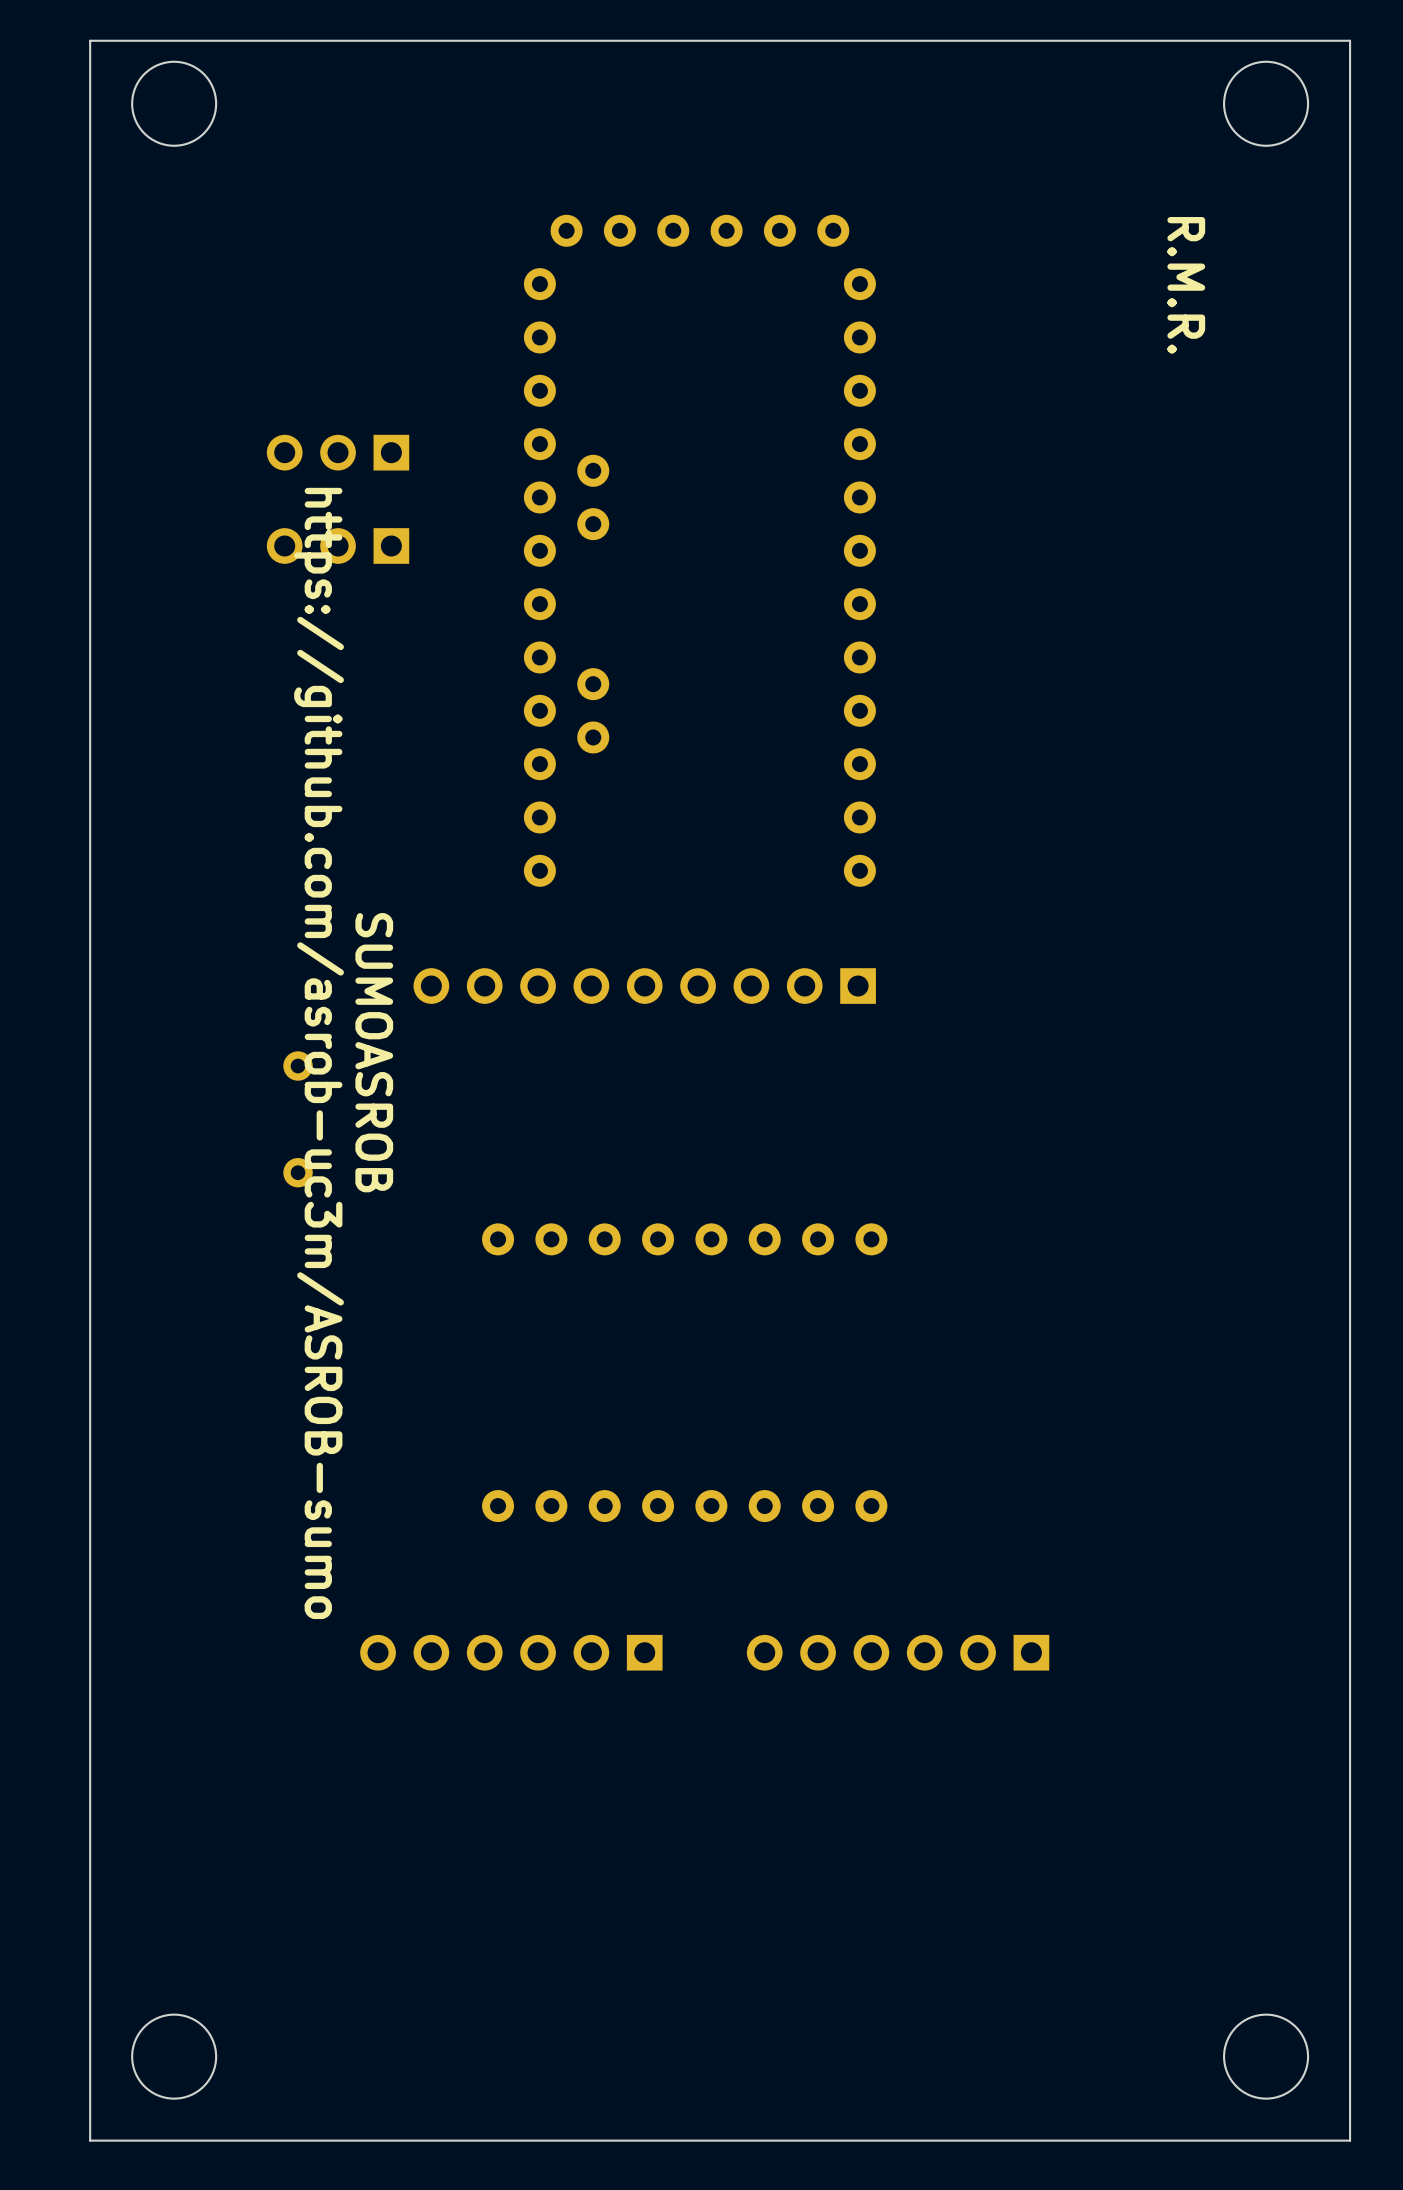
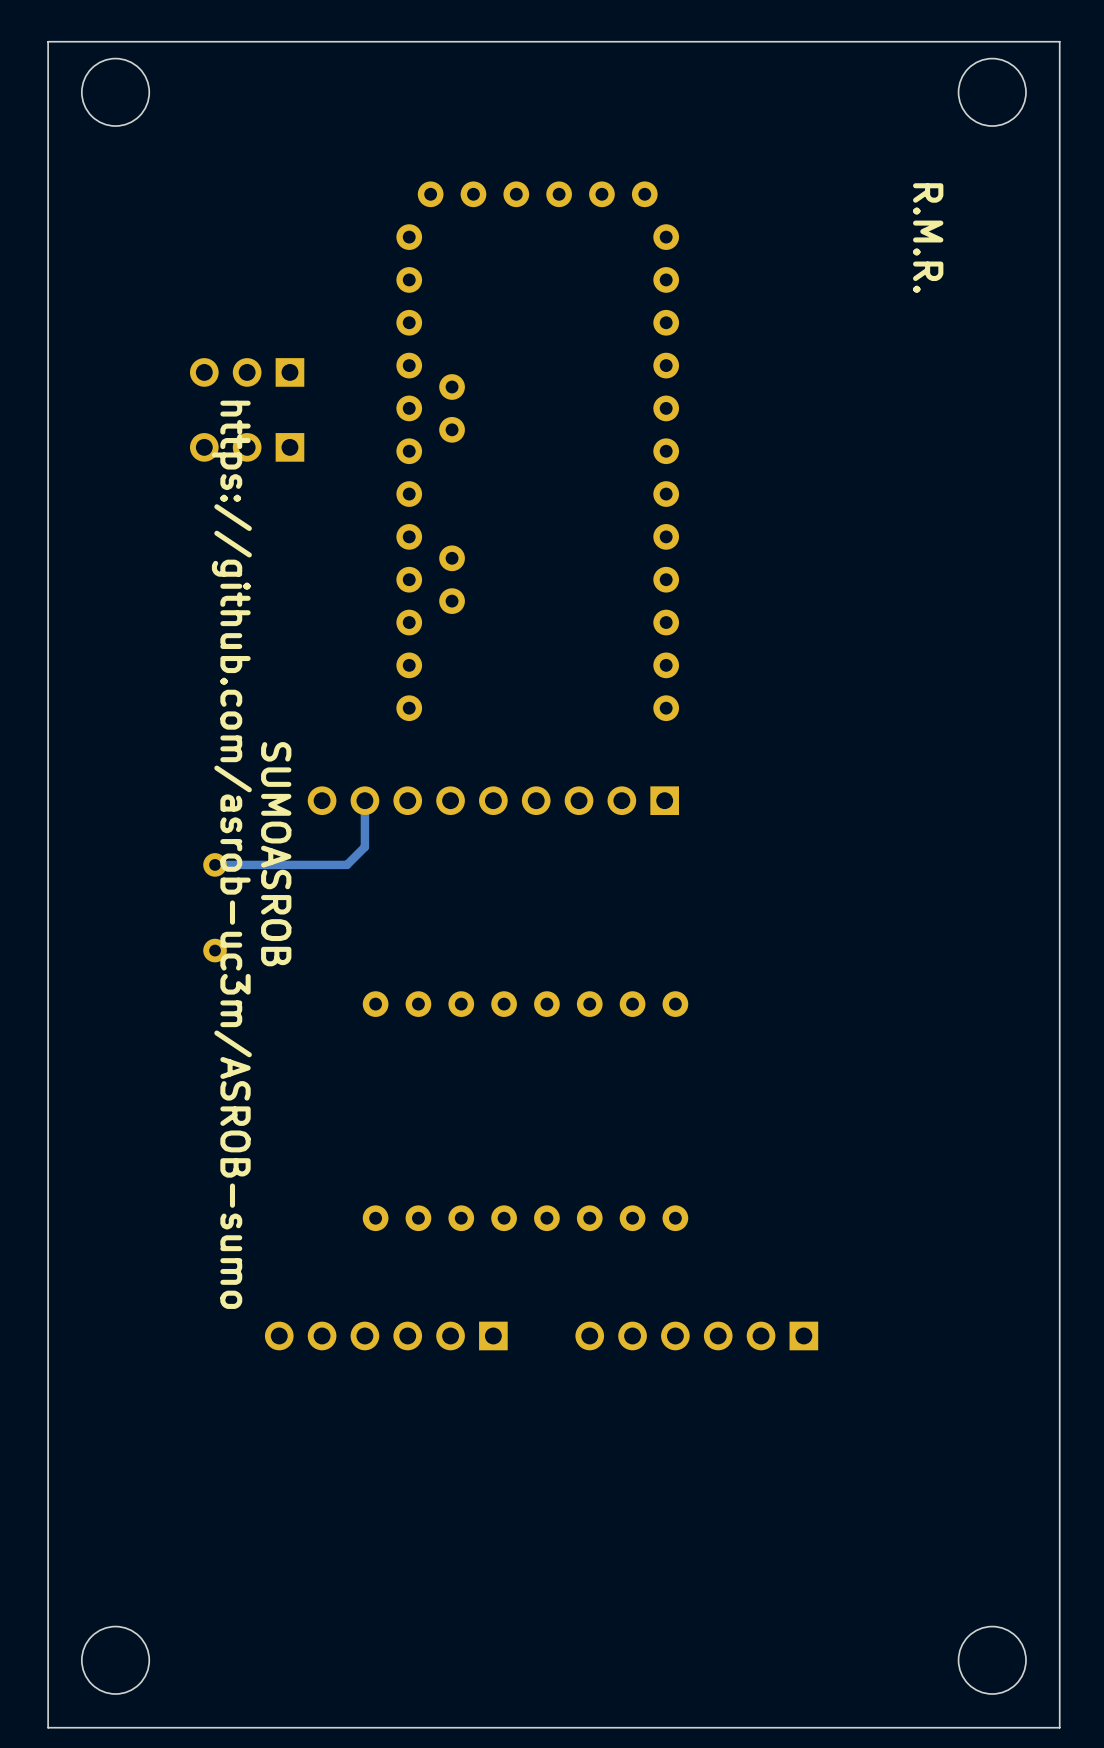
track: none -> (364, 800) (364, 846) (346, 864) (215, 864)

